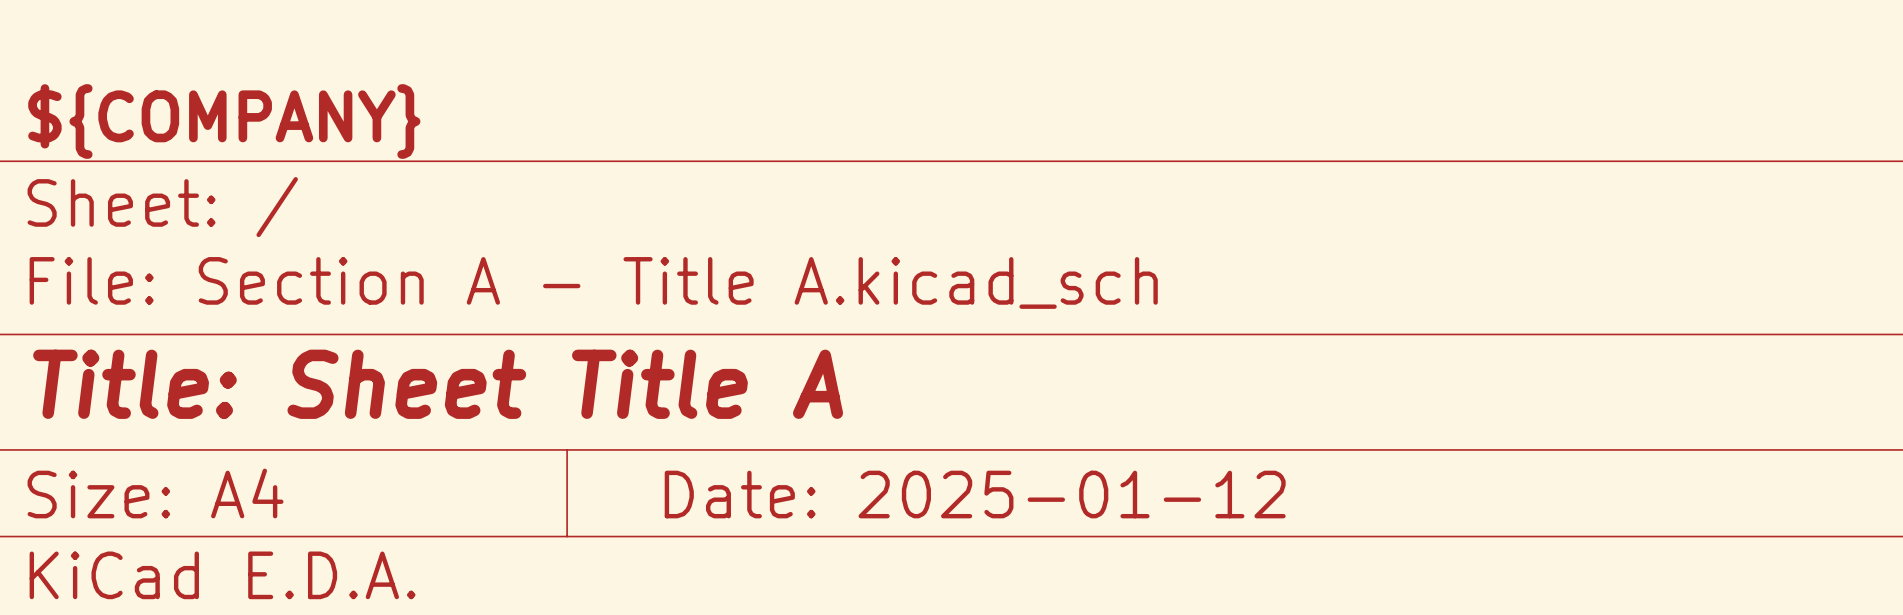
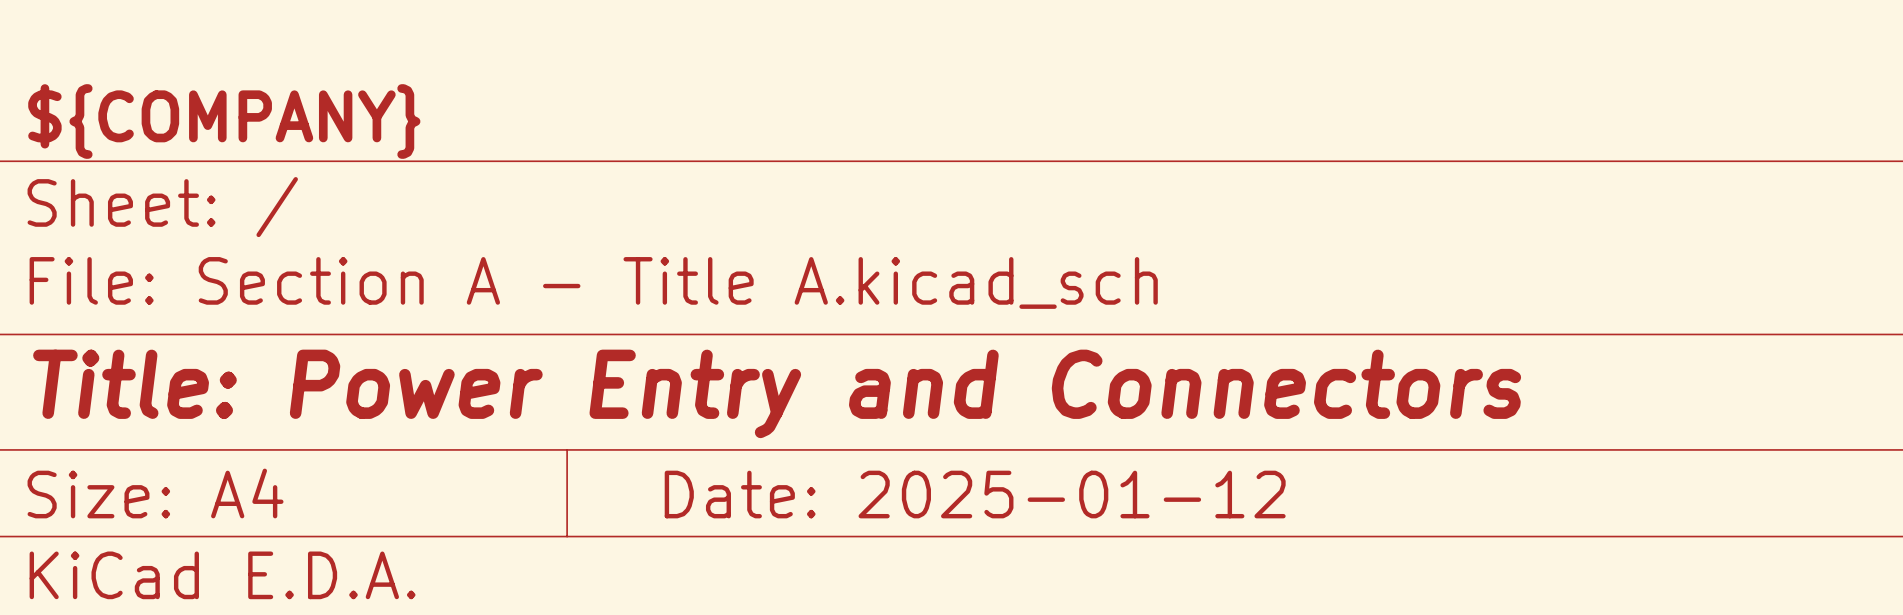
title block: Title: Sheet Title A (438, 384) -> Title: Power Entry and Connectors (777, 393)

